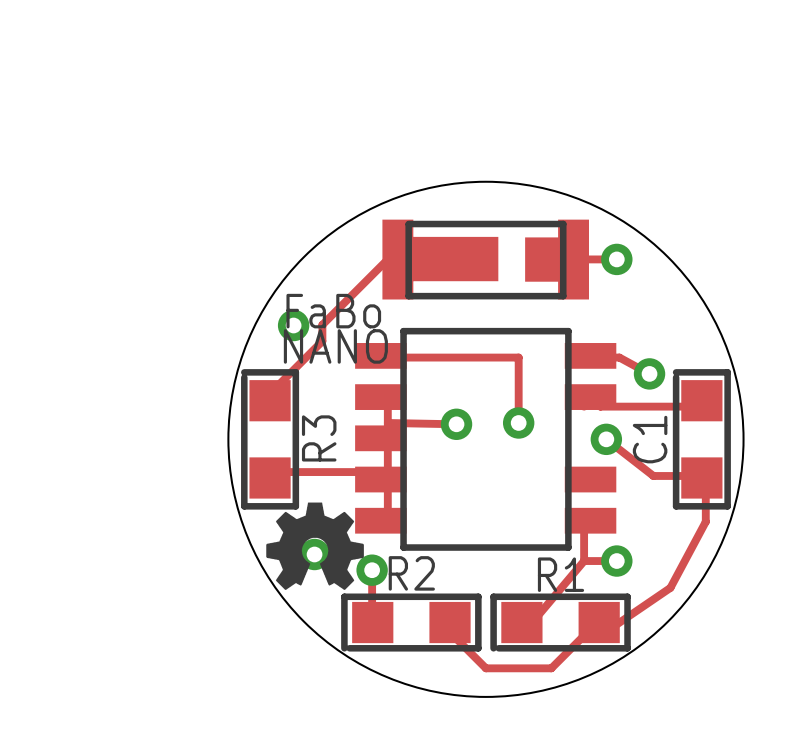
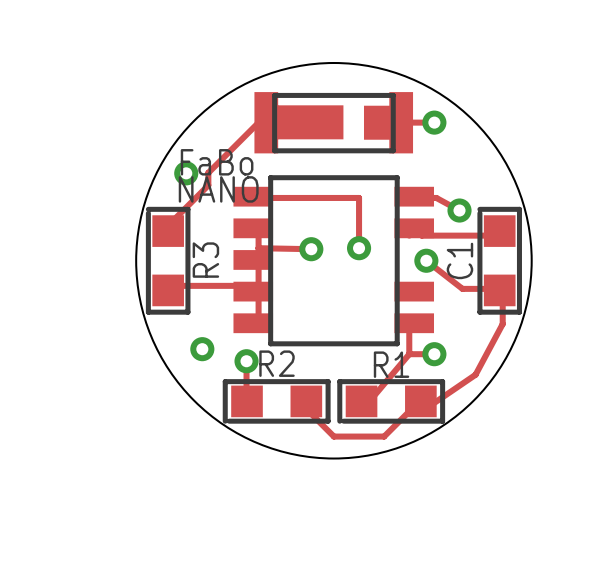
drawing: [266, 502, 364, 590] -> none

